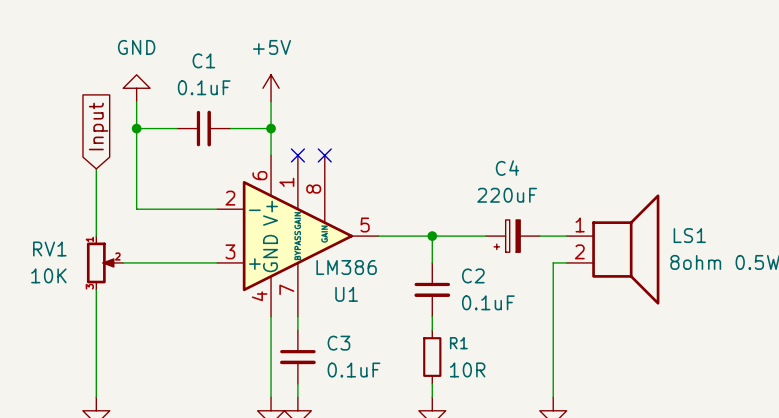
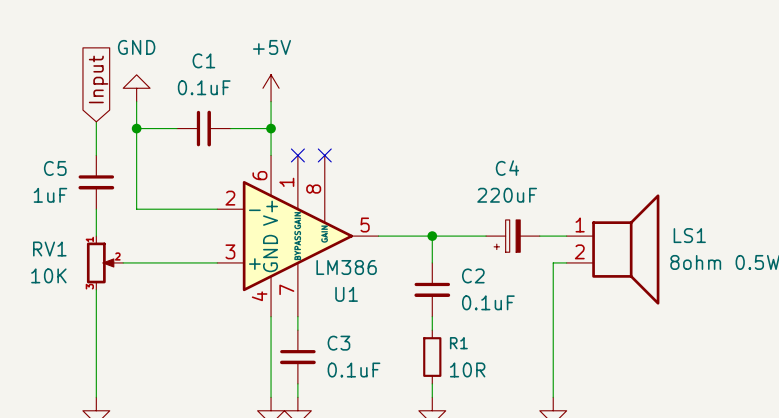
wire: none -> (96, 121) (96, 155)
global label position: Input (98, 126) -> Input (98, 79)
C5: none -> 1uF (96, 182)

